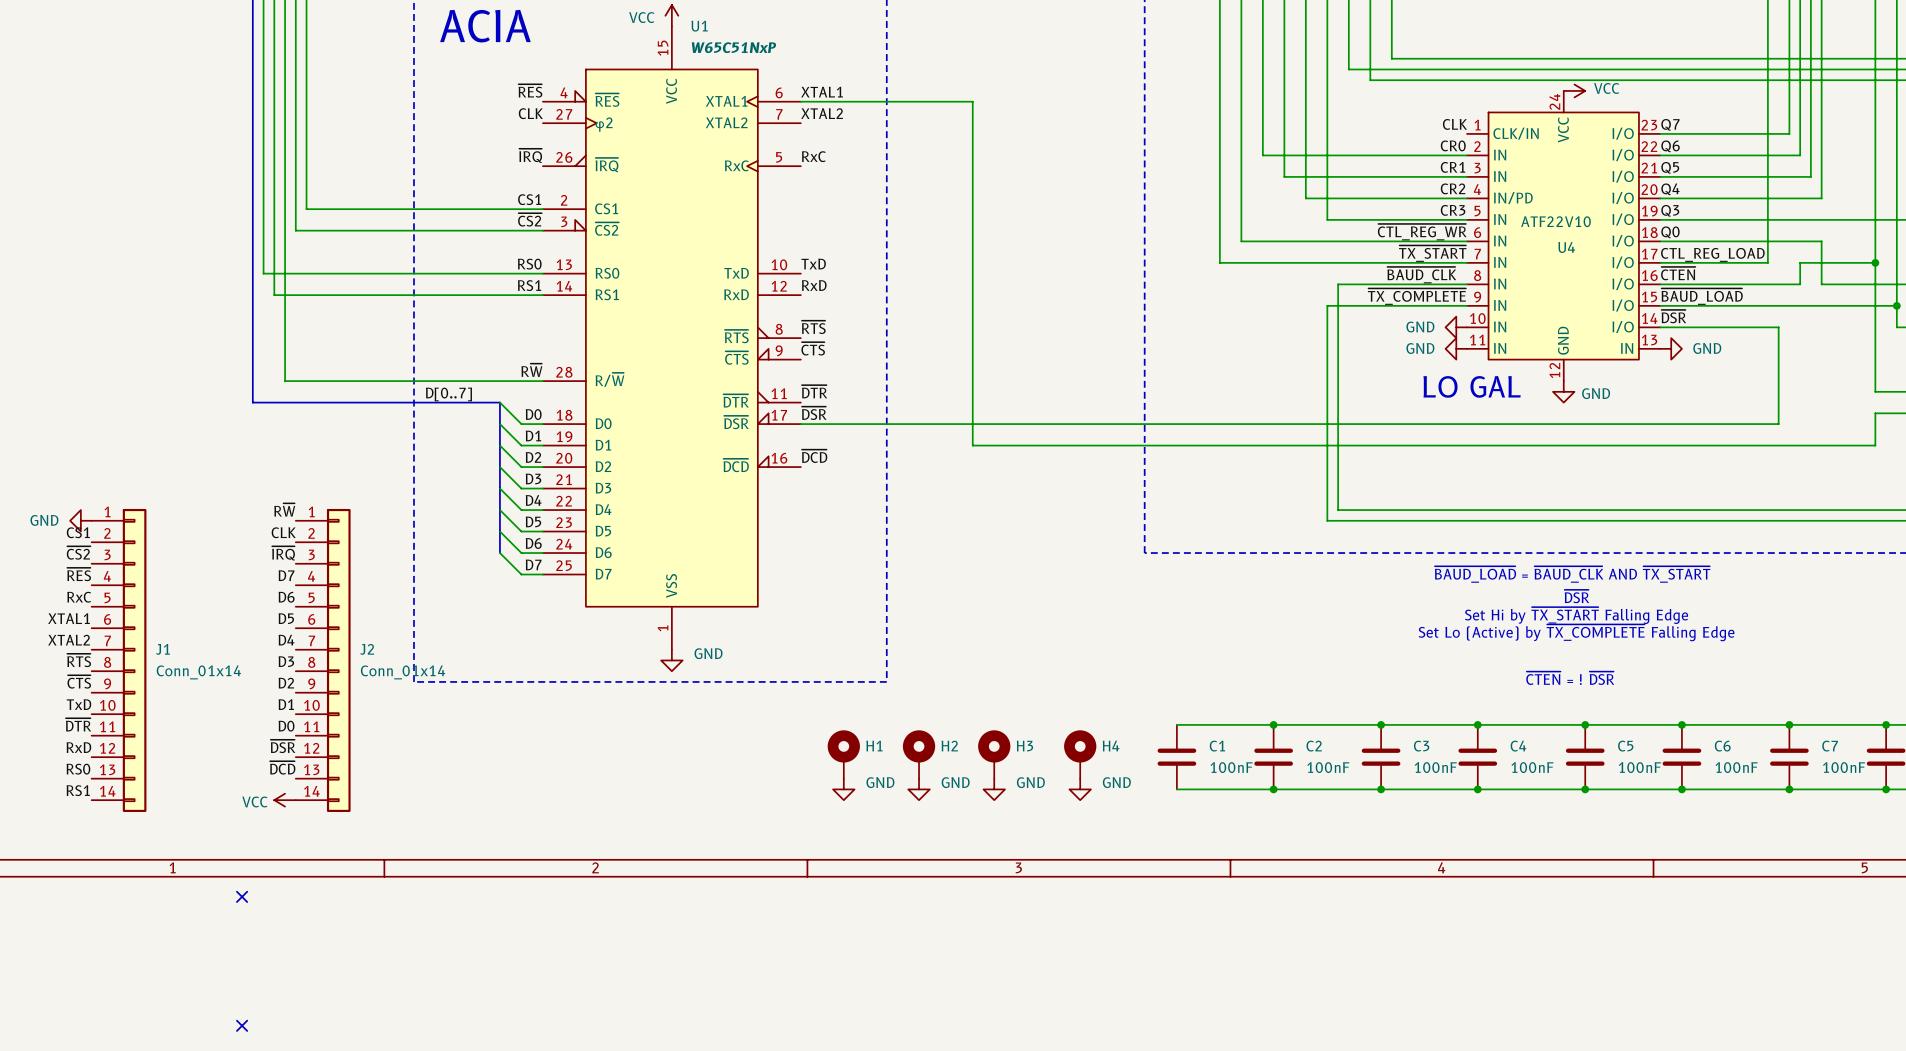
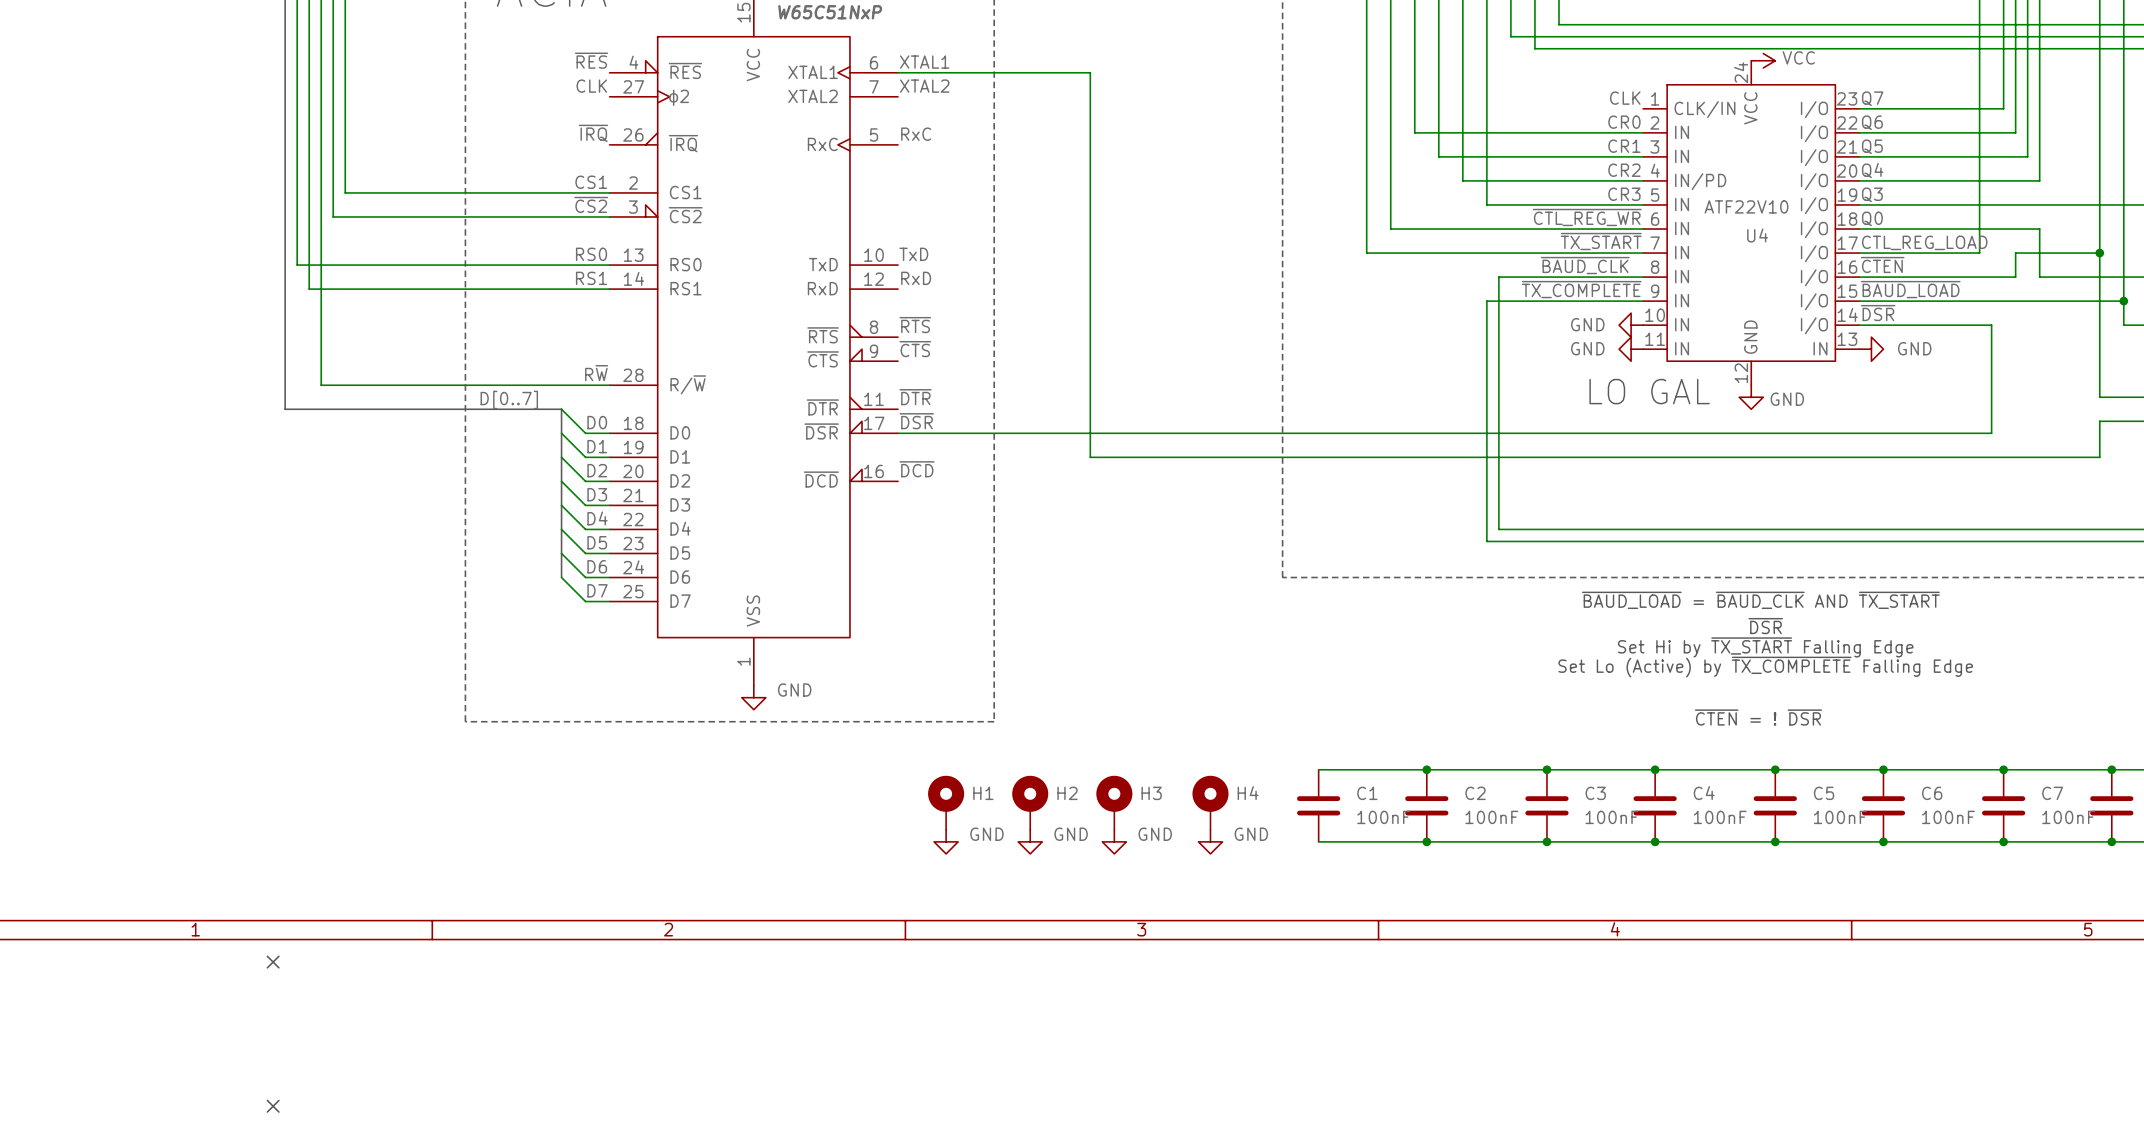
label: R~{W} (284, 509) -> none
power symbol: GND (80, 520) -> none
label: CS1 (78, 532) -> none
label: CLK (283, 532) -> none
label: ~{CS2} (78, 552) -> none
label: ~{IRQ} (283, 553) -> none
label: ~{RES} (79, 574) -> none
label: D7 (286, 575) -> none
label: RxC (79, 597) -> none
label: D6 (286, 597) -> none
label: XTAL1 (69, 618) -> none
label: D5 (286, 618) -> none
label: XTAL2 (69, 640) -> none
label: D4 (286, 640) -> none
label: ~{RTS} (79, 660) -> none
J1: Conn_01x14 (119, 660) -> none
J2: Conn_01x14 (323, 660) -> none
label: D3 (286, 661) -> none
label: ~{CTS} (79, 681) -> none
label: D2 (286, 683) -> none
label: TxD (78, 704) -> none
label: D1 (286, 704) -> none
label: ~{DTR} (78, 724) -> none
label: D0 (286, 726) -> none
label: ~{DSR} (283, 746) -> none
label: RxD (78, 747) -> none
label: ~{DCD} (282, 767) -> none
label: RS0 (78, 769) -> none
label: RS1 (78, 790) -> none
power symbol: VCC (285, 800) -> none

